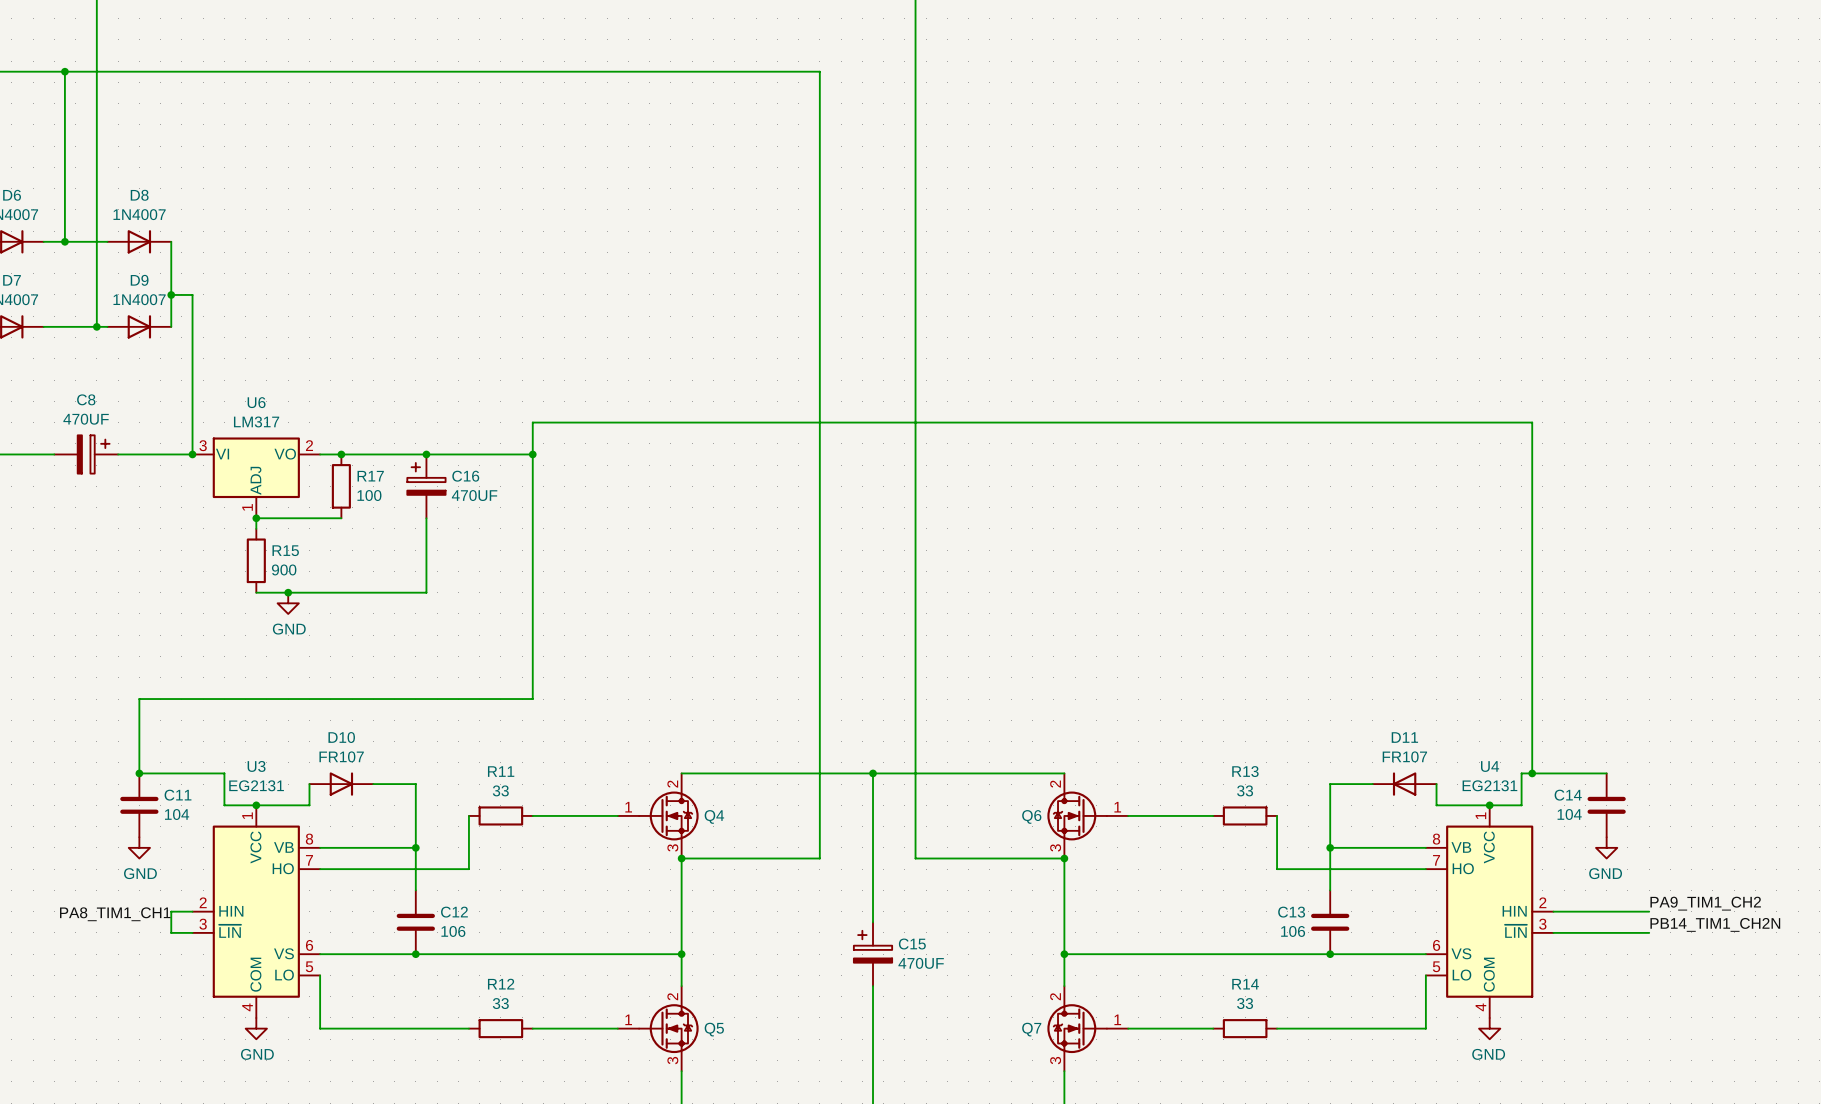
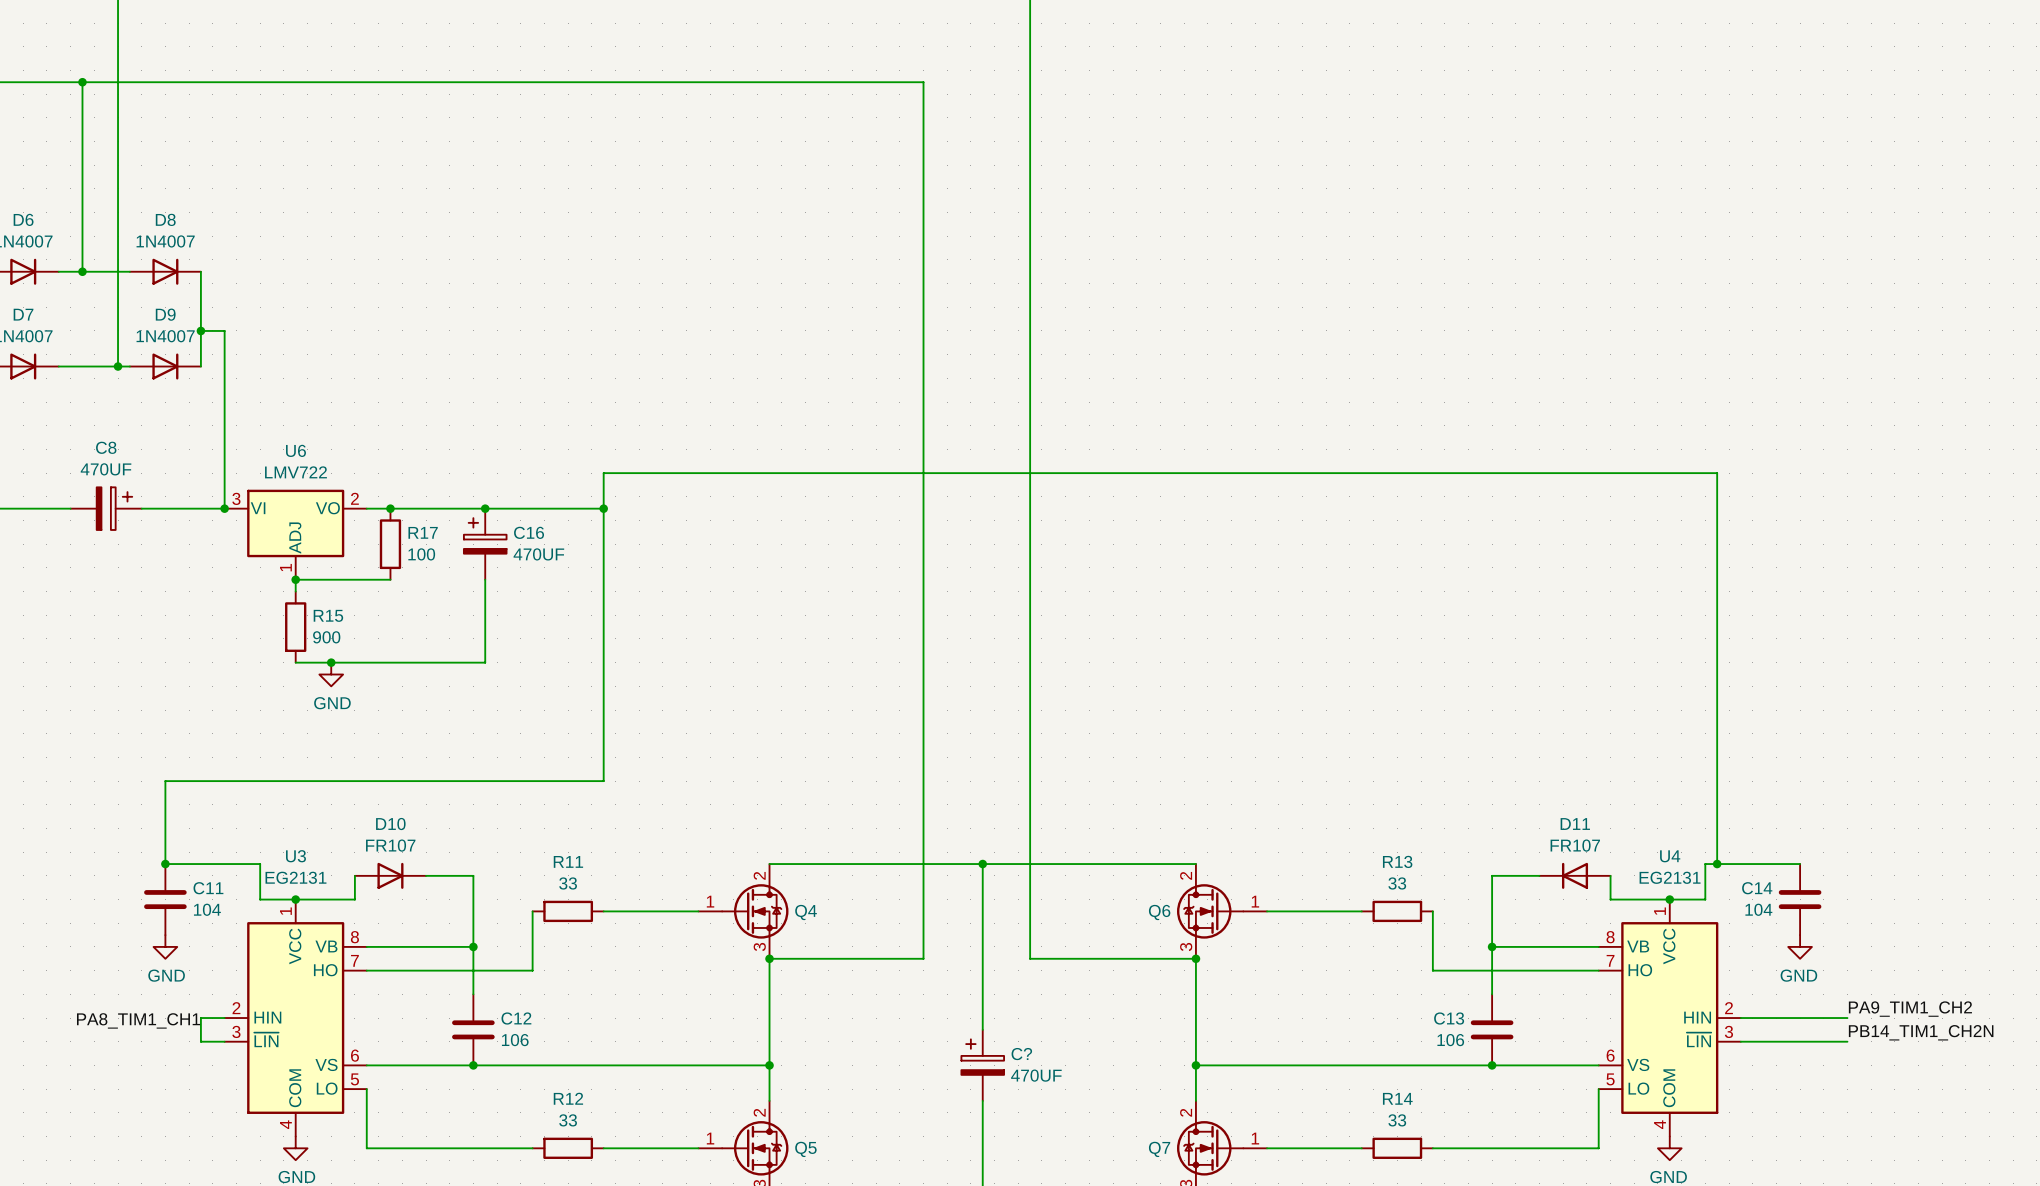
U6 value: LM317 (256, 421) -> LMV722 (295, 472)
C15 name: C15 (912, 944) -> C? (1021, 1054)

